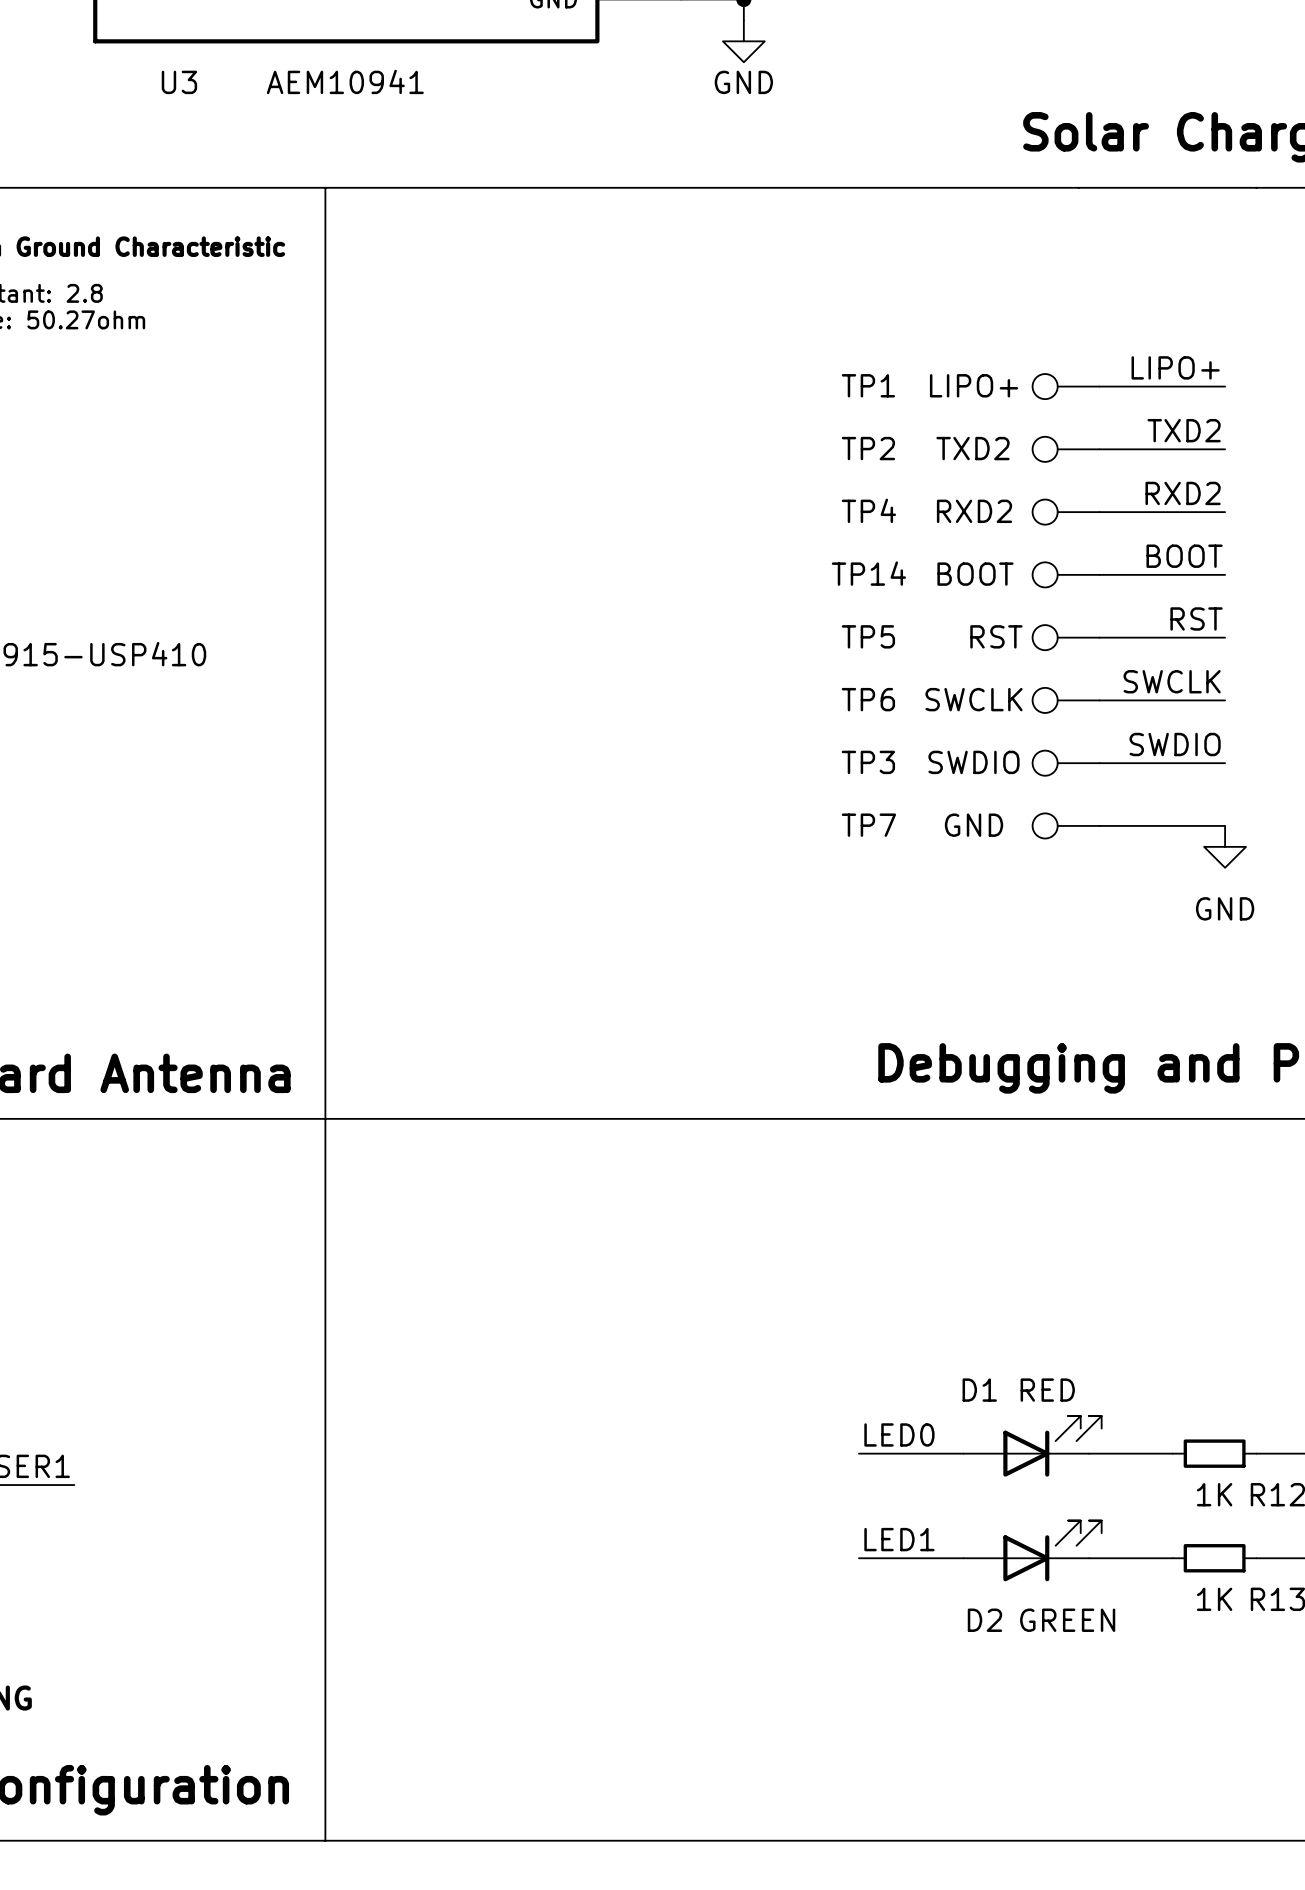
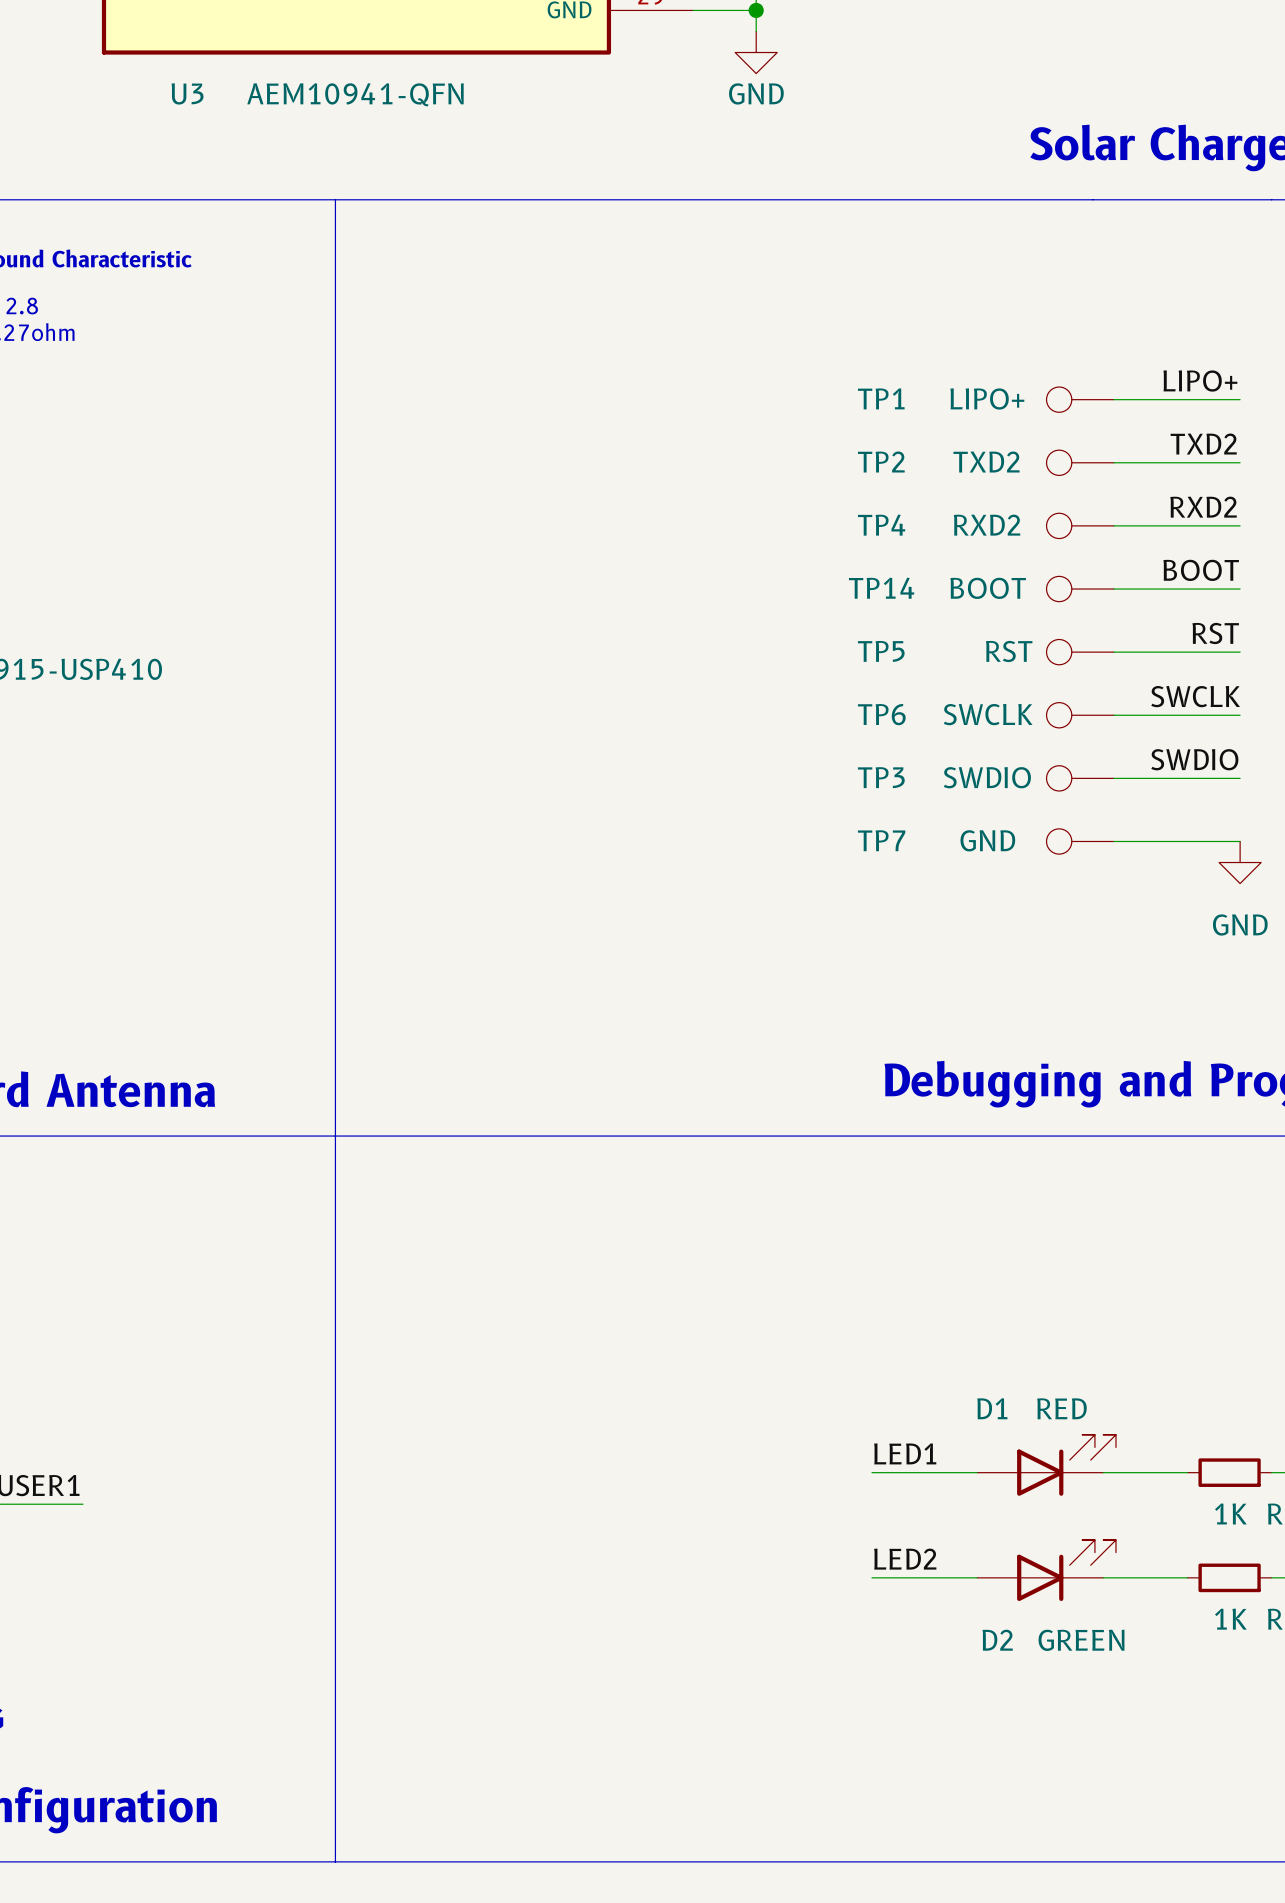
U3 value: AEM10941 (345, 81) -> AEM10941-QFN (355, 94)
label: LED0 (899, 1434) -> LED1 (905, 1453)
label: LED1 (899, 1539) -> LED2 (905, 1559)

